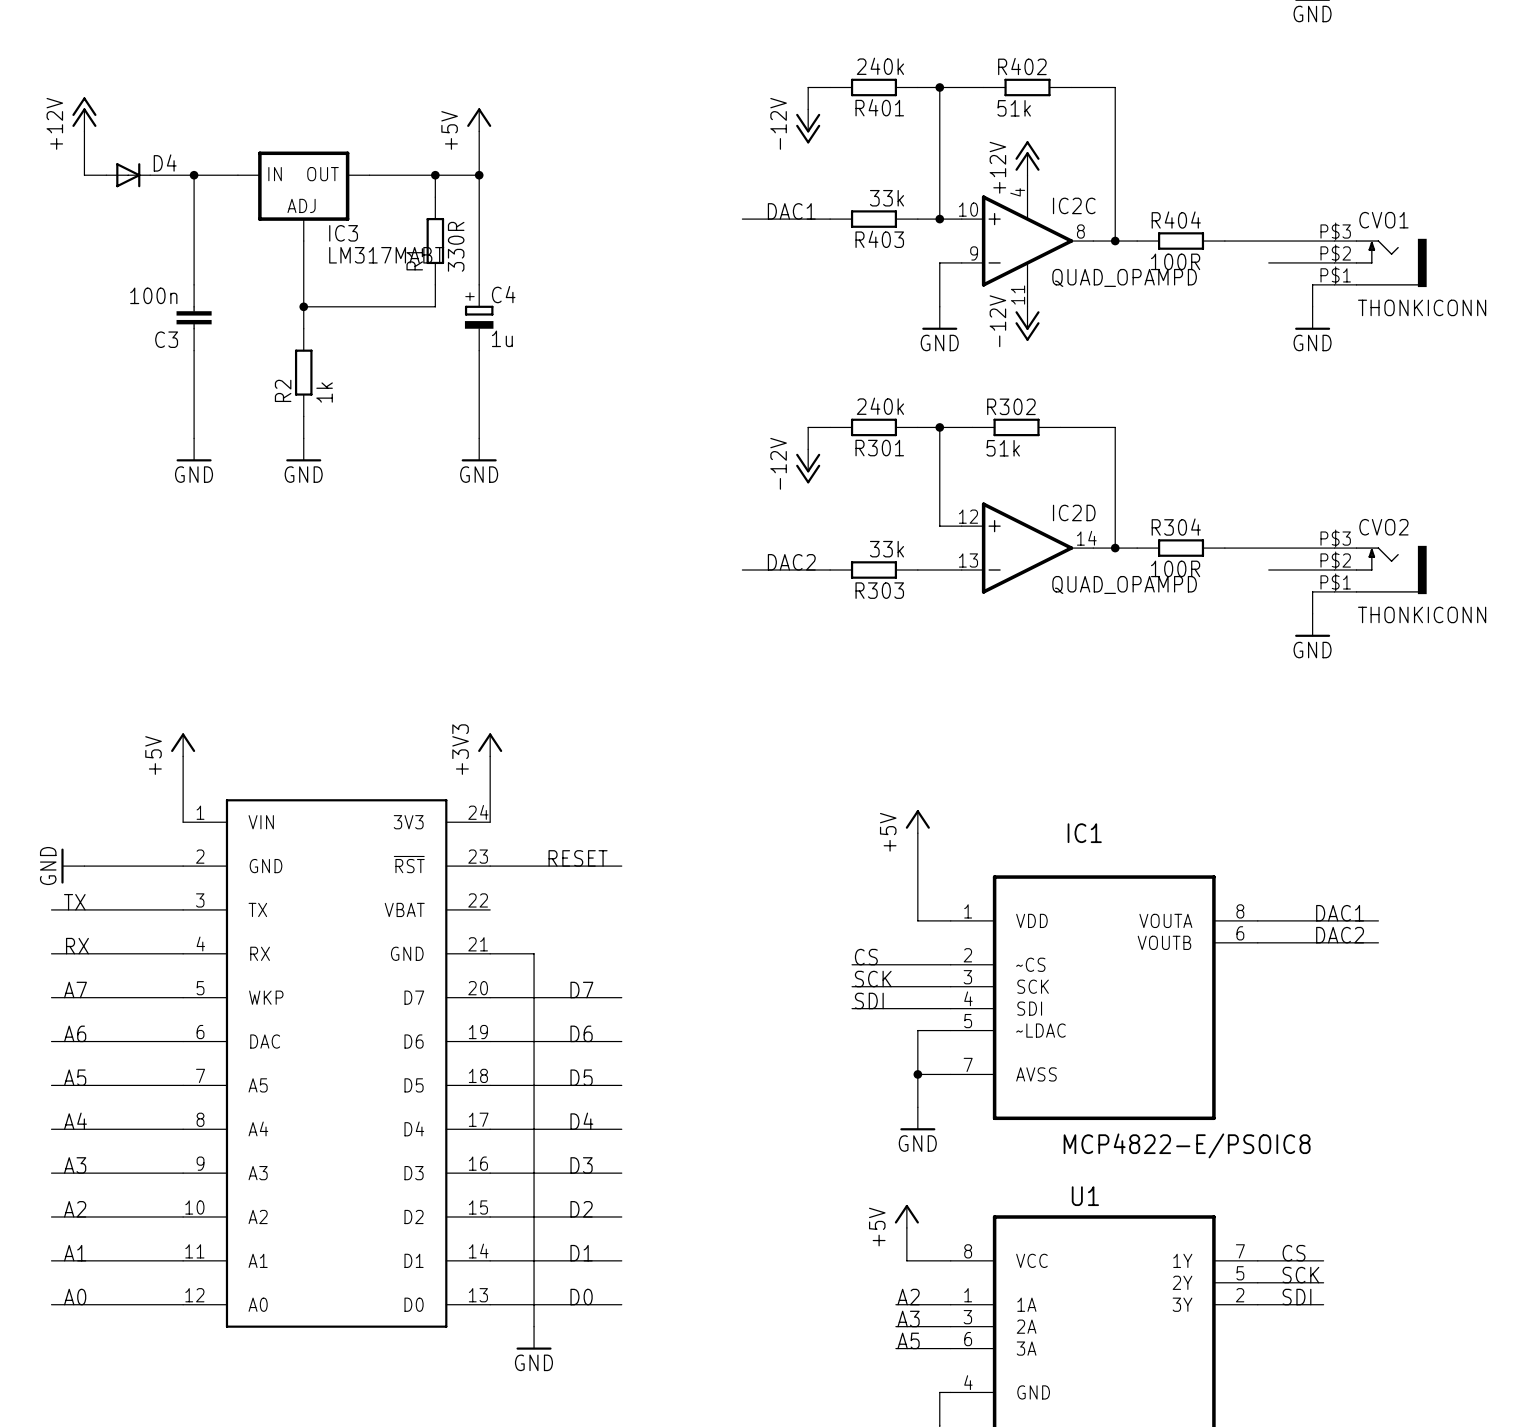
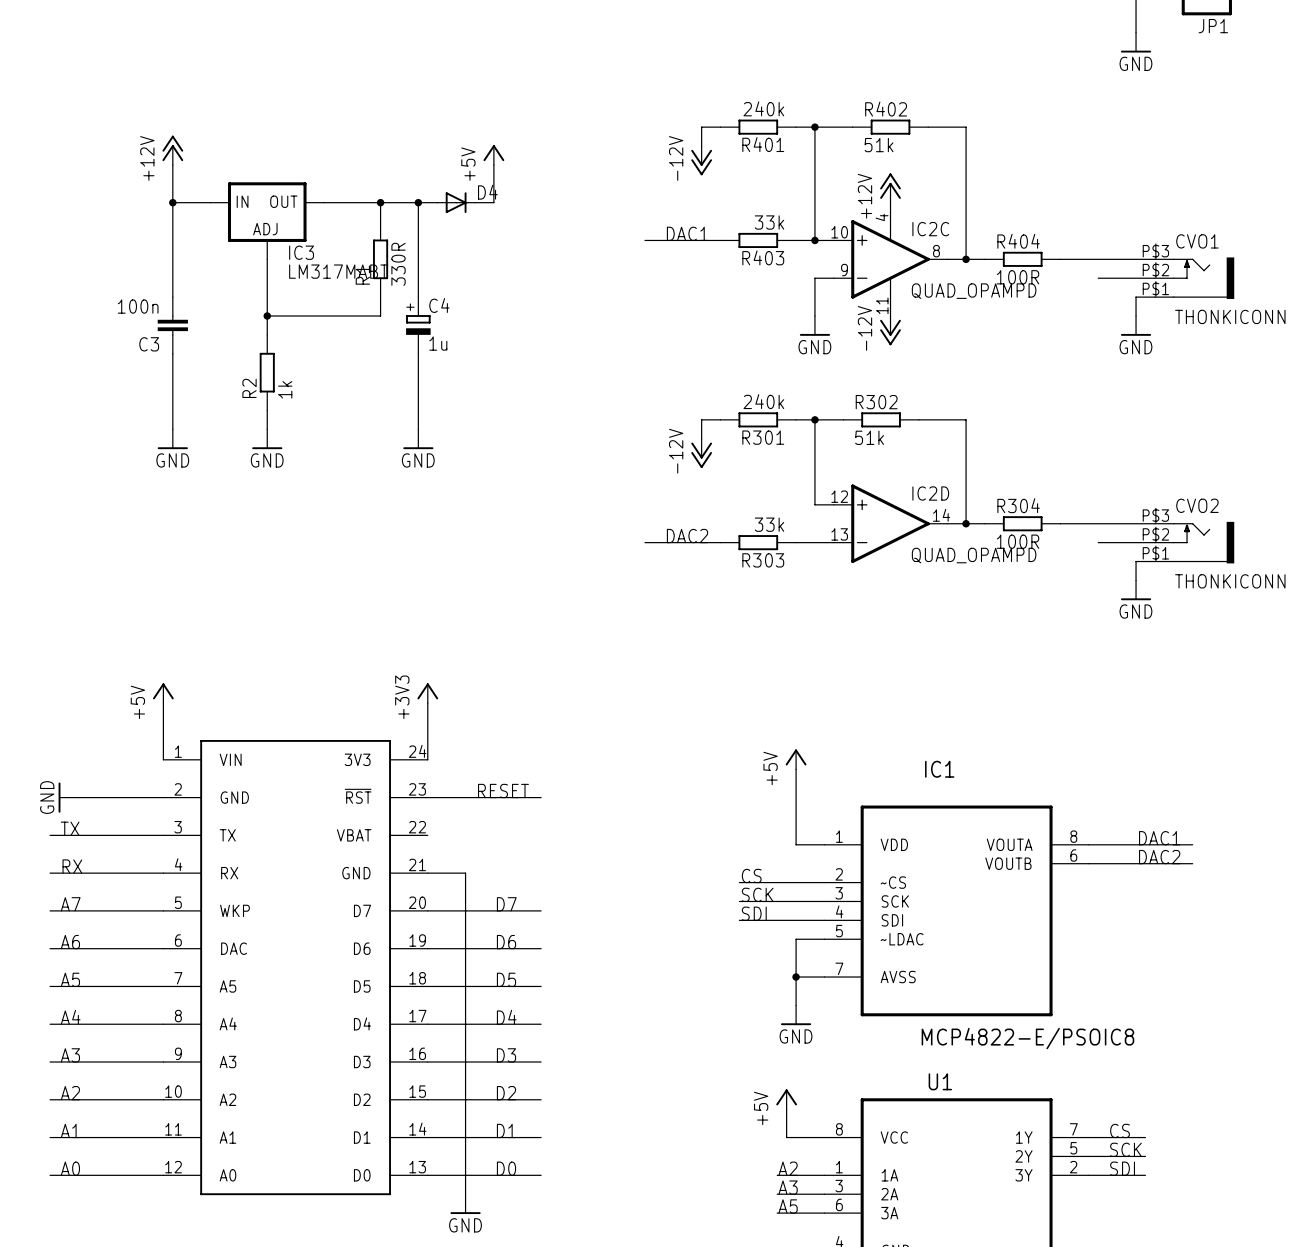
power symbol position: +12V (84, 114) -> +12V (172, 150)
power symbol position: +5V (479, 119) -> +5V (493, 154)
wire: (84, 131) (84, 175) (106, 175) -> none
wire: (479, 131) (479, 175) -> (437, 202) (418, 202)
wire: none -> (493, 164) (493, 202) (475, 202)
D4 position: (128, 175) -> (456, 202)
wire: (150, 175) (194, 175) -> (172, 164) (172, 202)

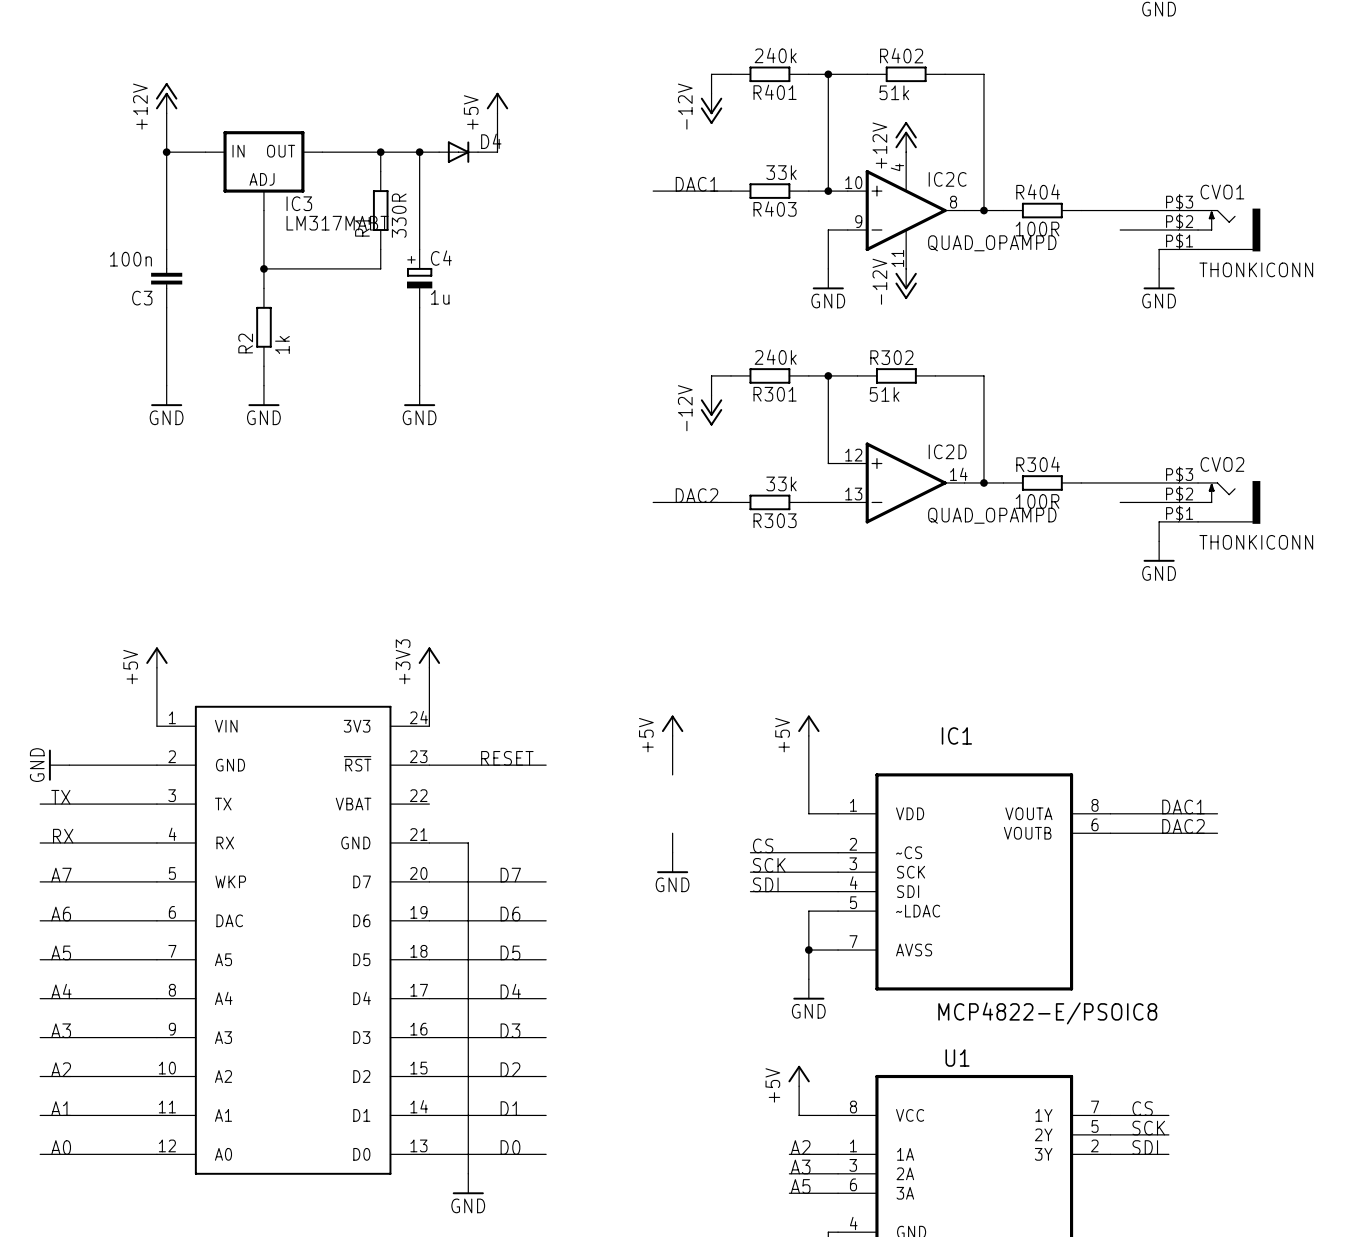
power symbol: none -> +5V (672, 725)
wire: none -> (672, 735) (672, 774)
wire: none -> (672, 833) (672, 852)
power symbol: none -> GND (672, 862)

